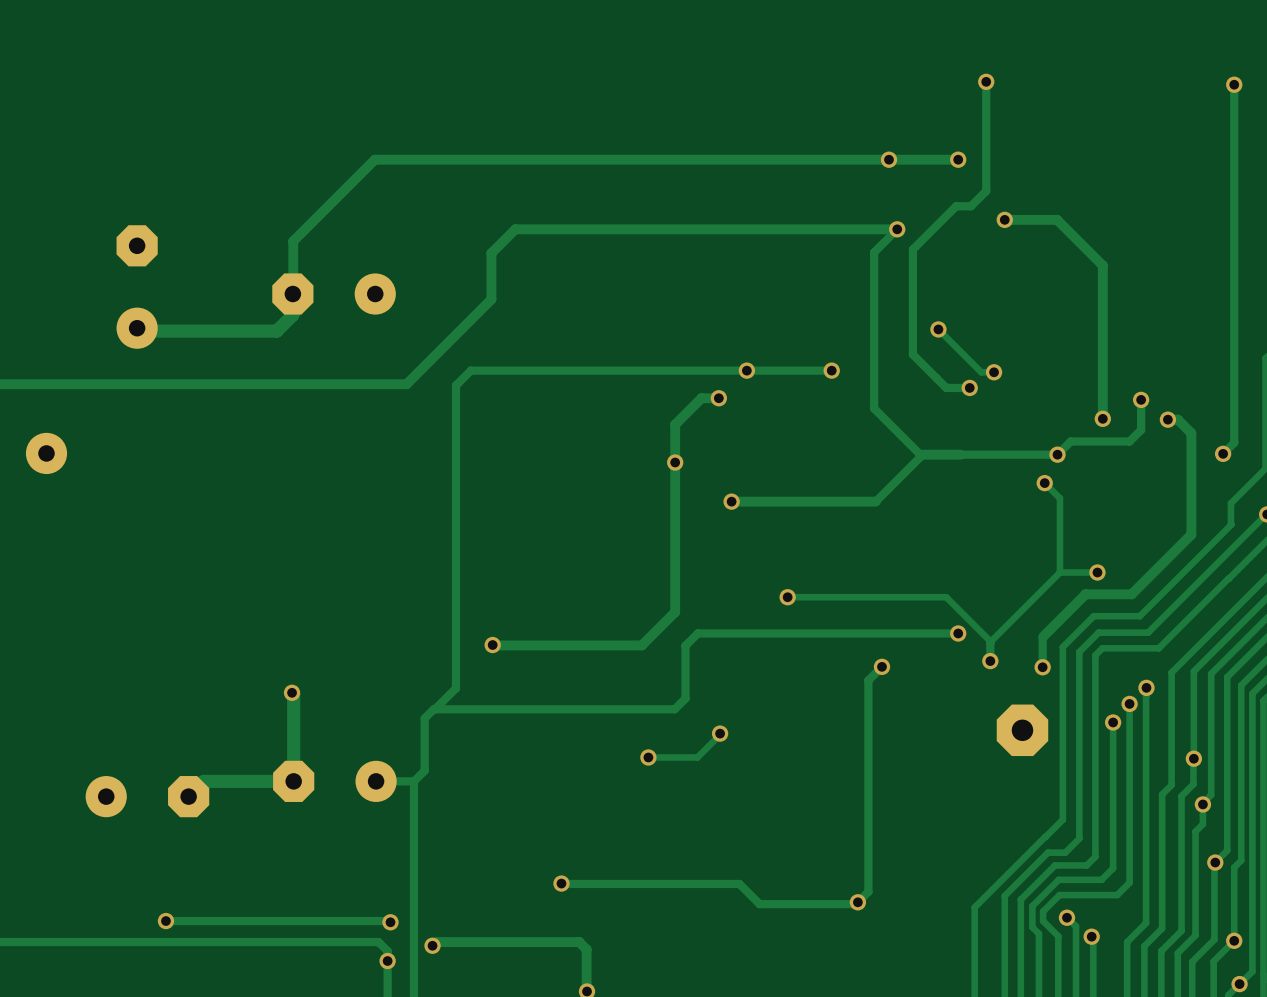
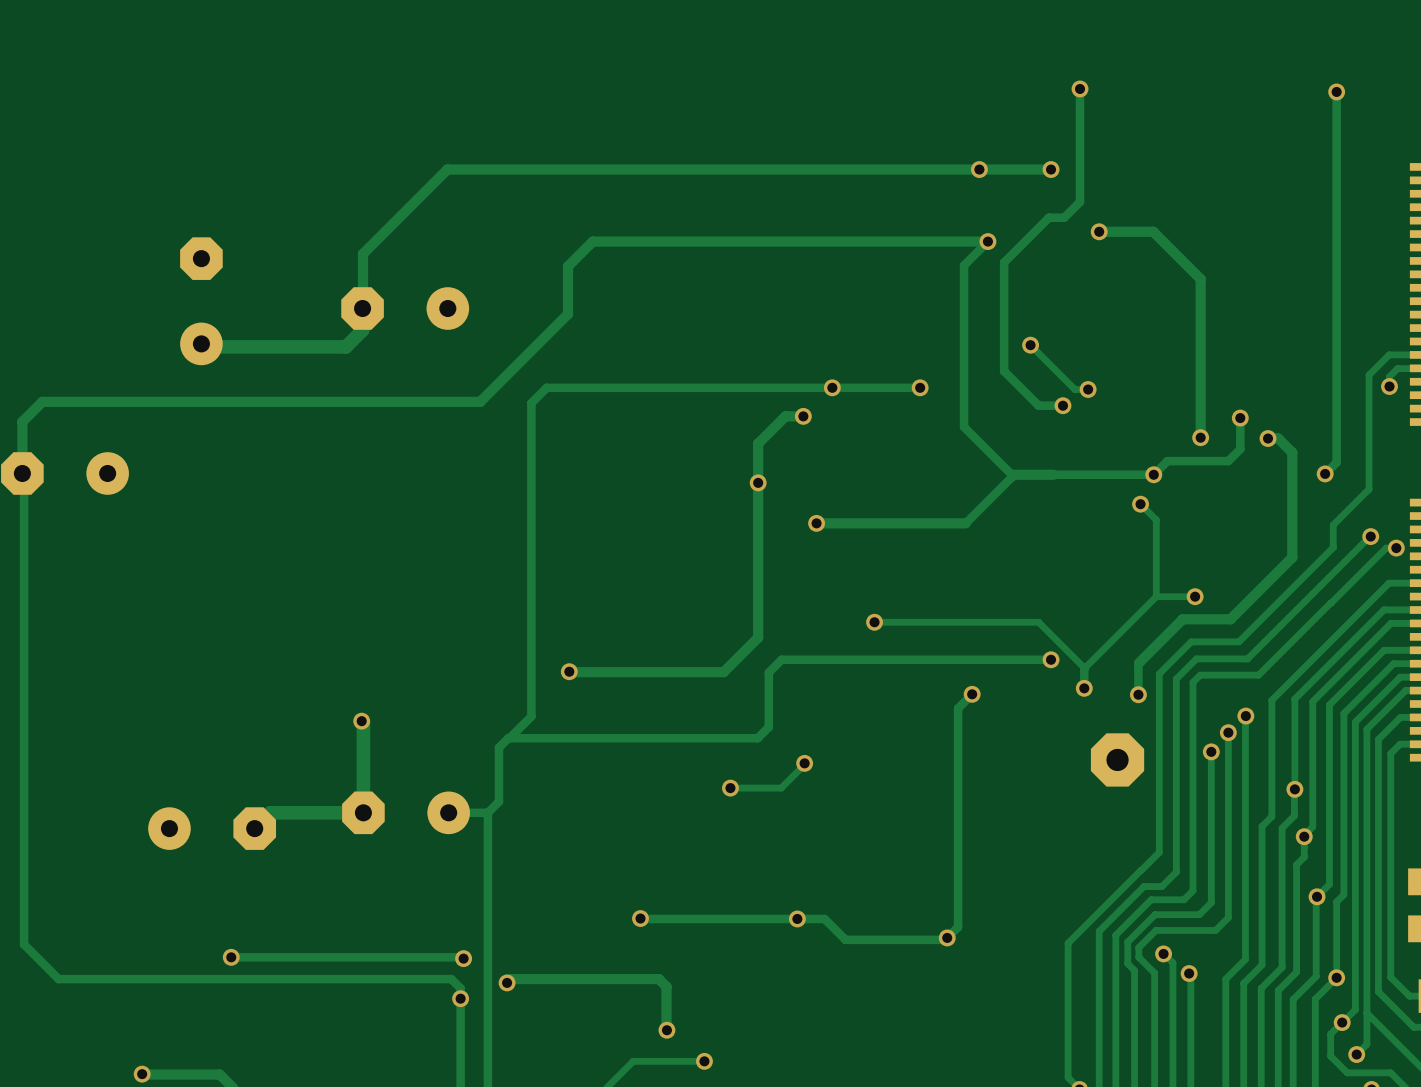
via: none -> (797, 918)

